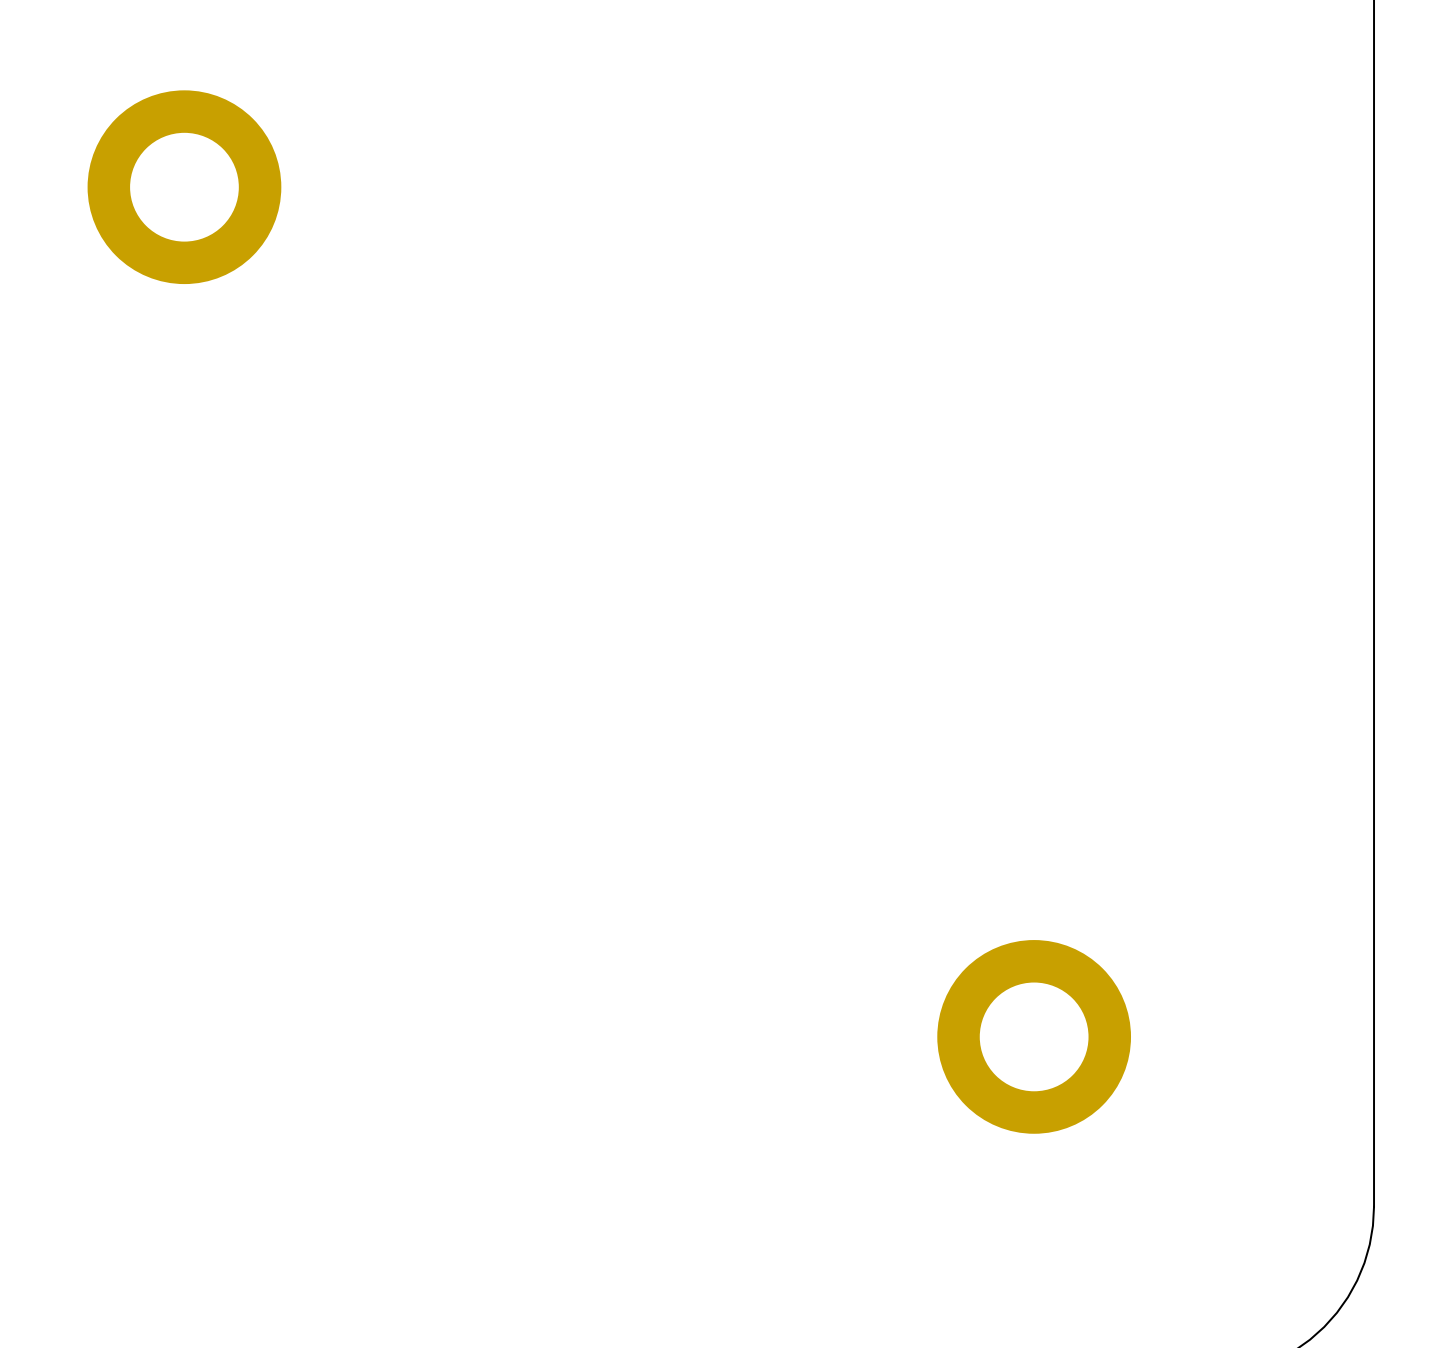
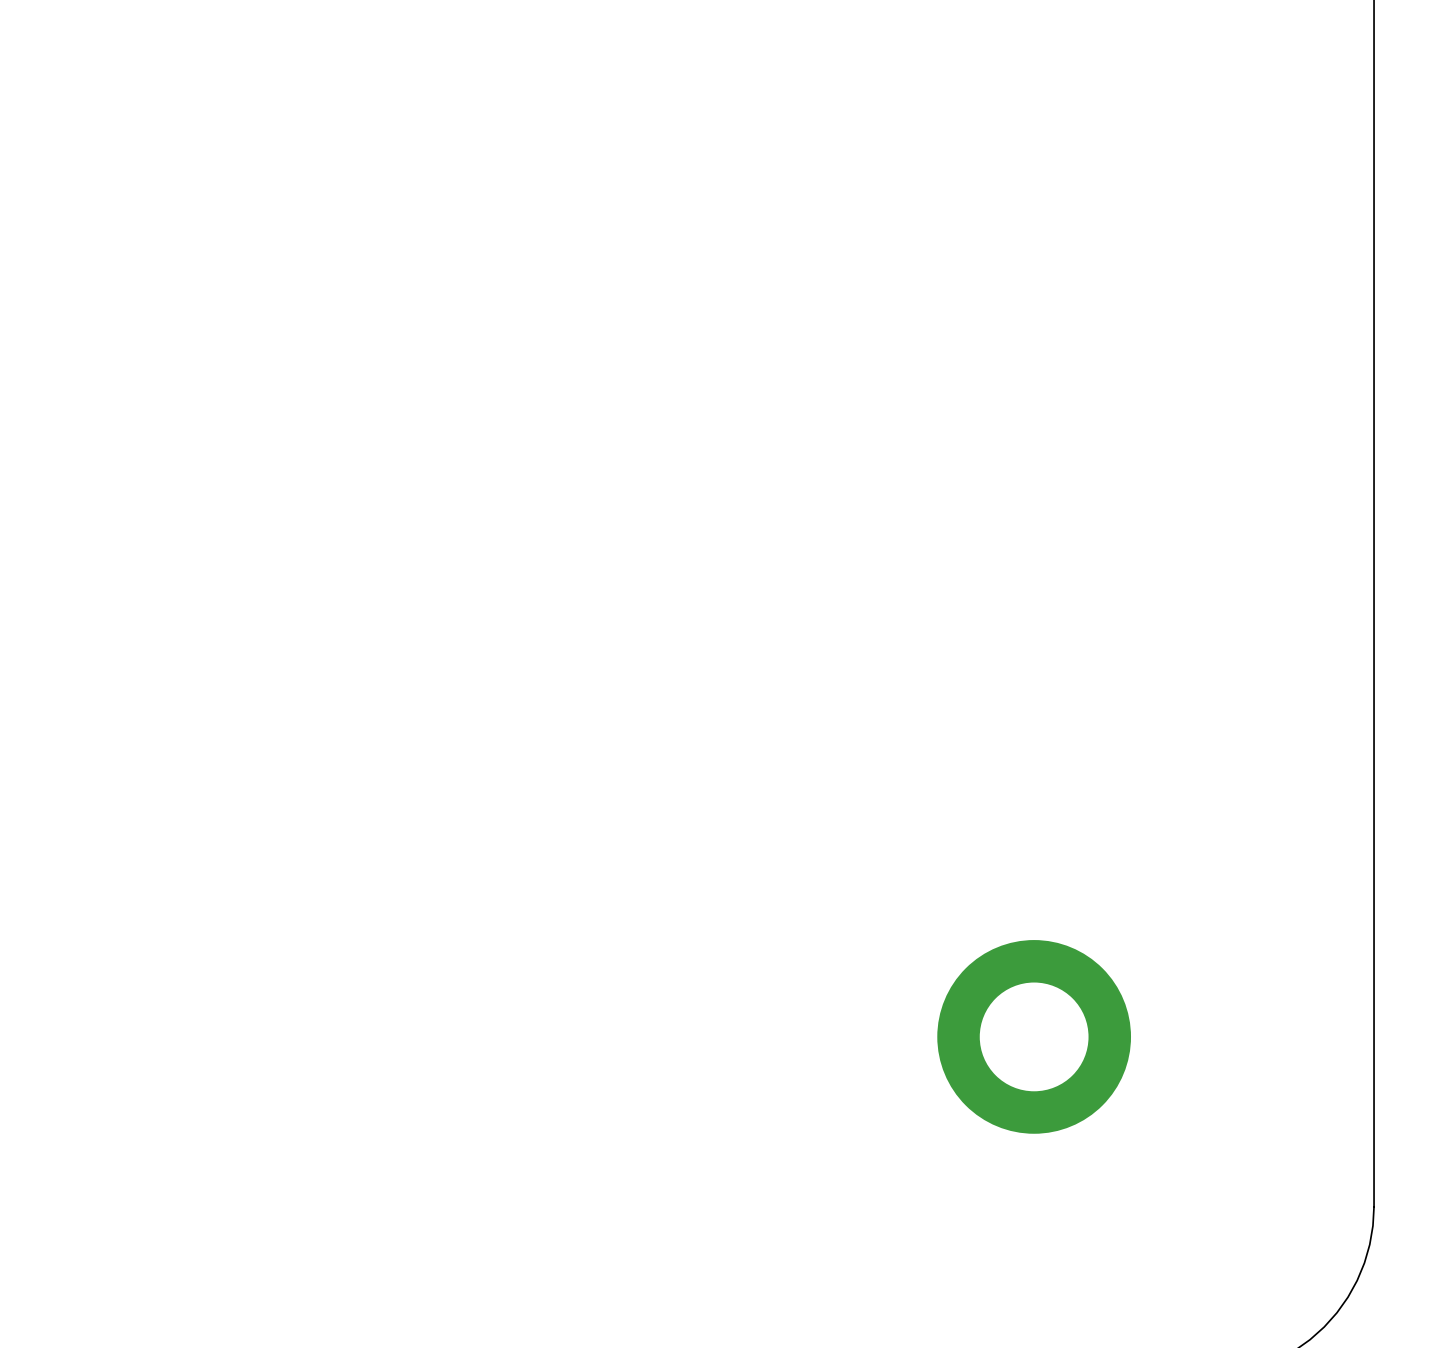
part: (184, 187) -> none

